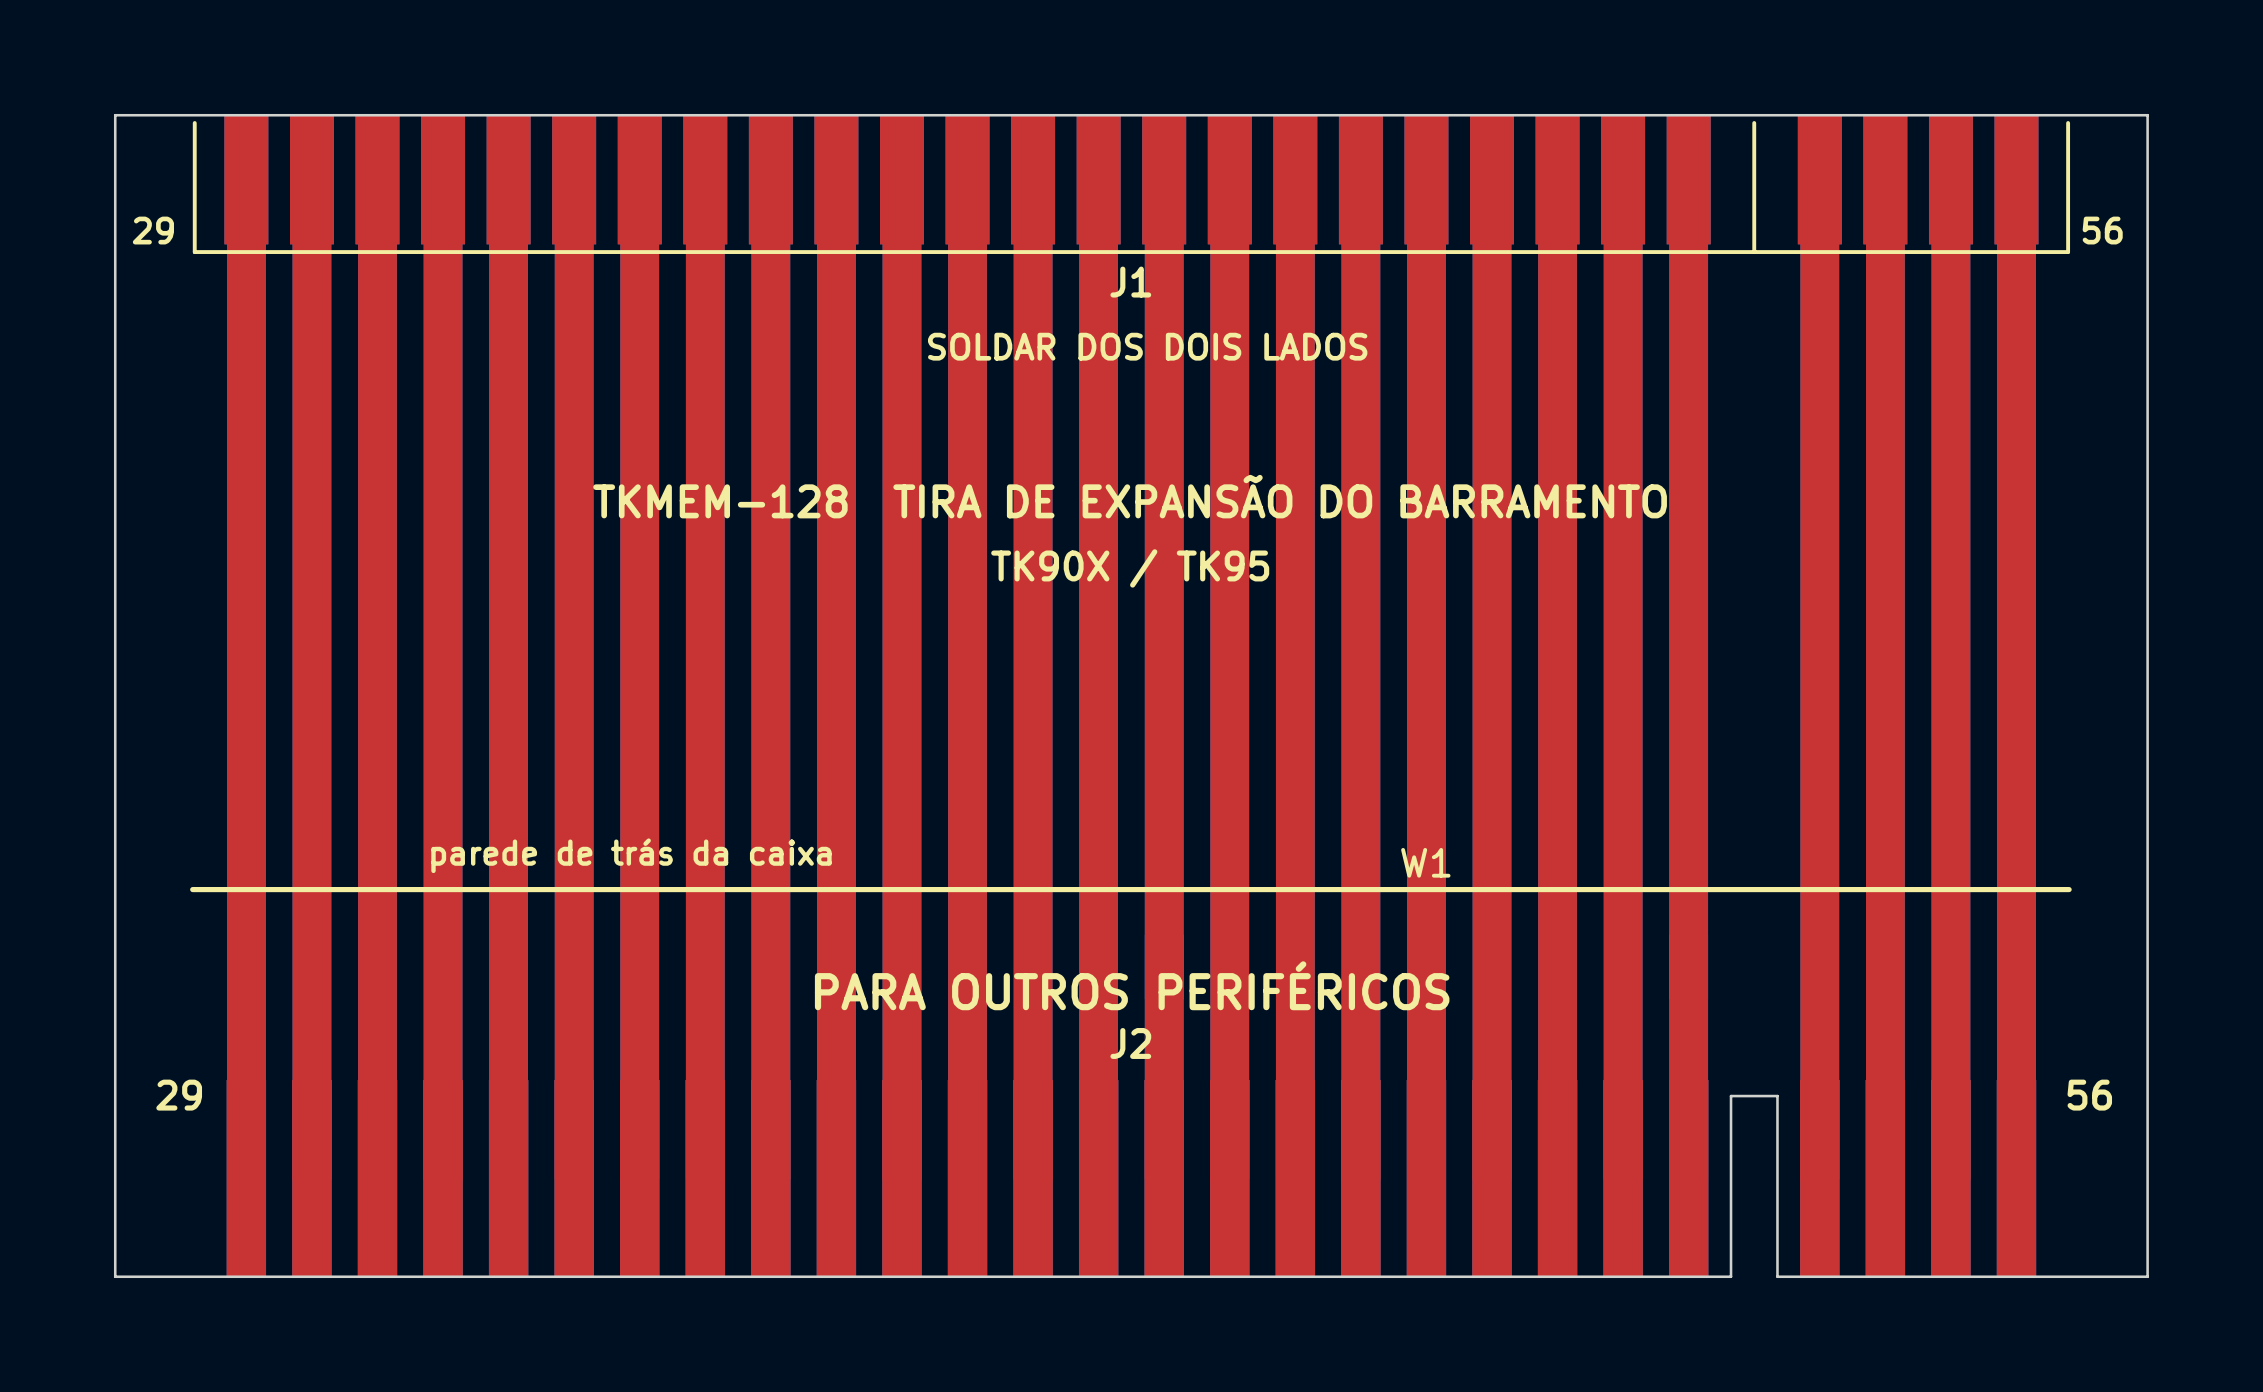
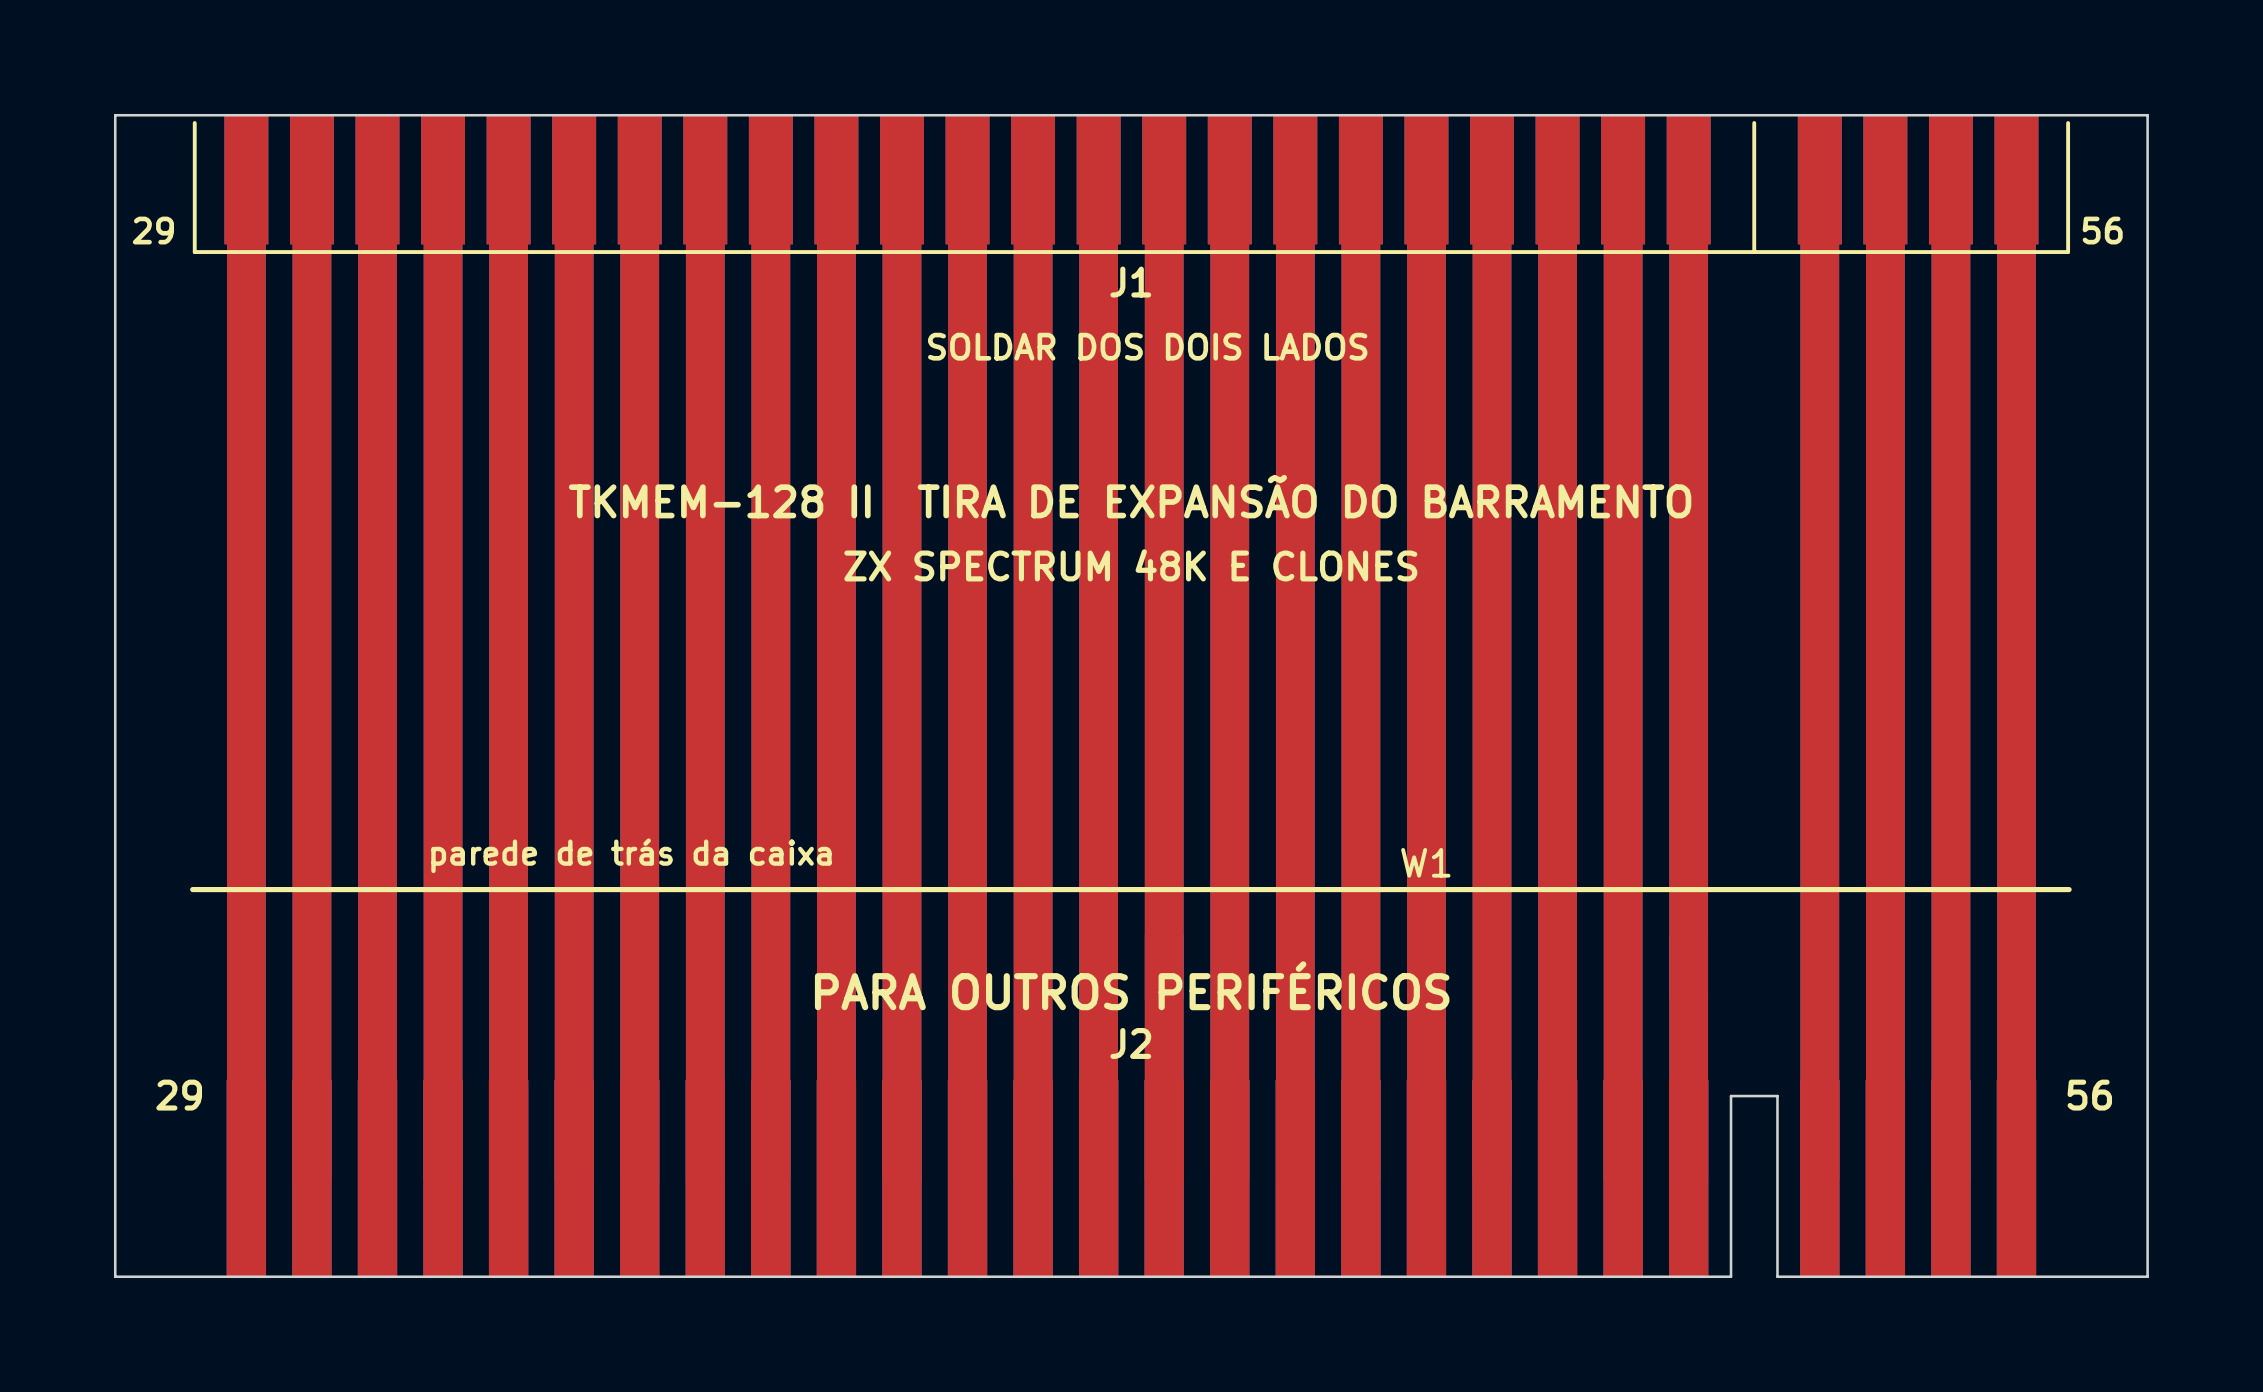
text: TKMEM-128 TIRA DE EXPANSÃO DO BARRAMENTO (1130, 496) -> TKMEM-128 II TIRA DE EXPANSÃO DO BARRAMENTO (1130, 496)
text: TK90X / TK95 (1130, 568) -> ZX SPECTRUM 48K E CLONES (1130, 565)

